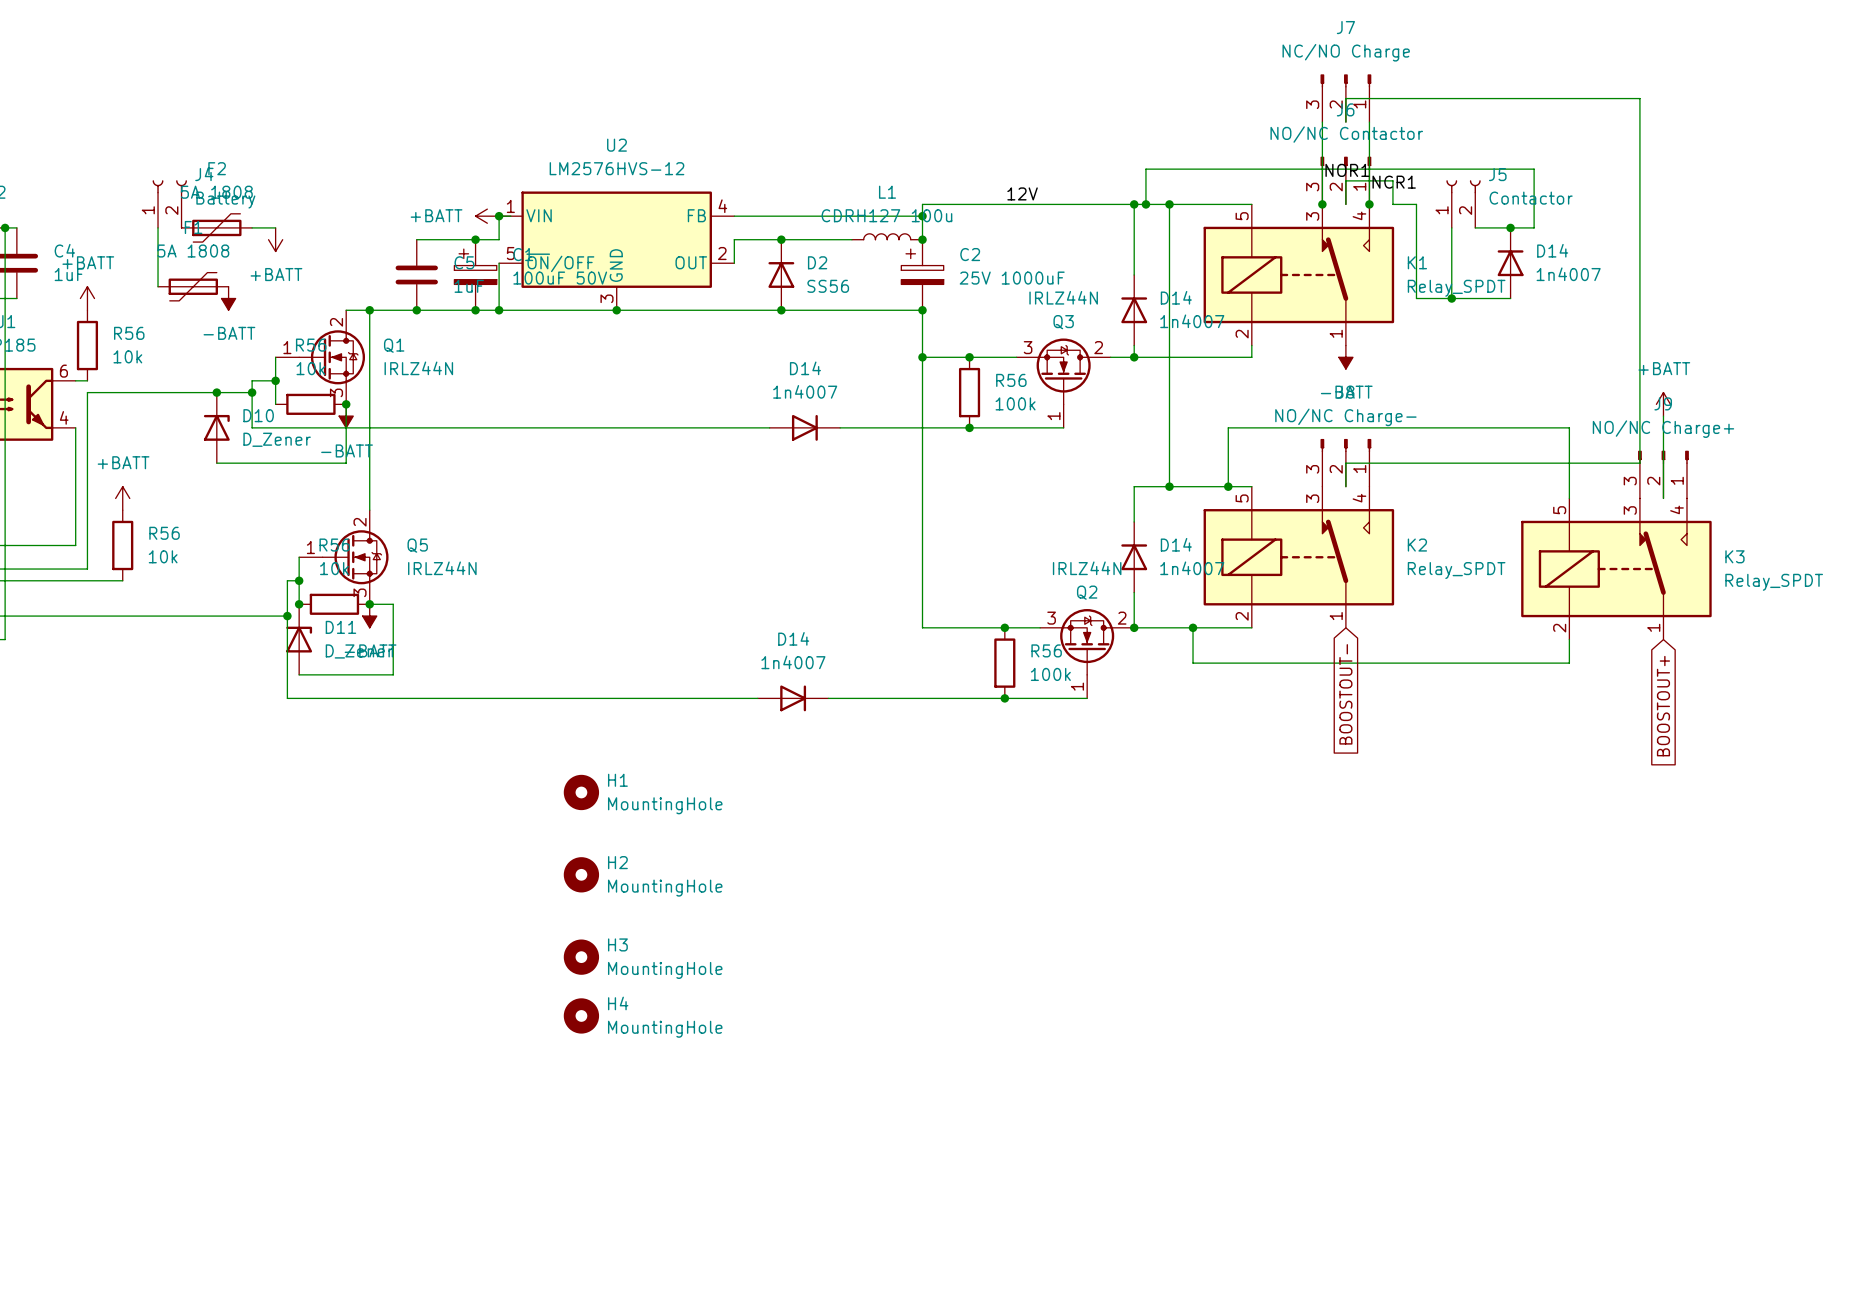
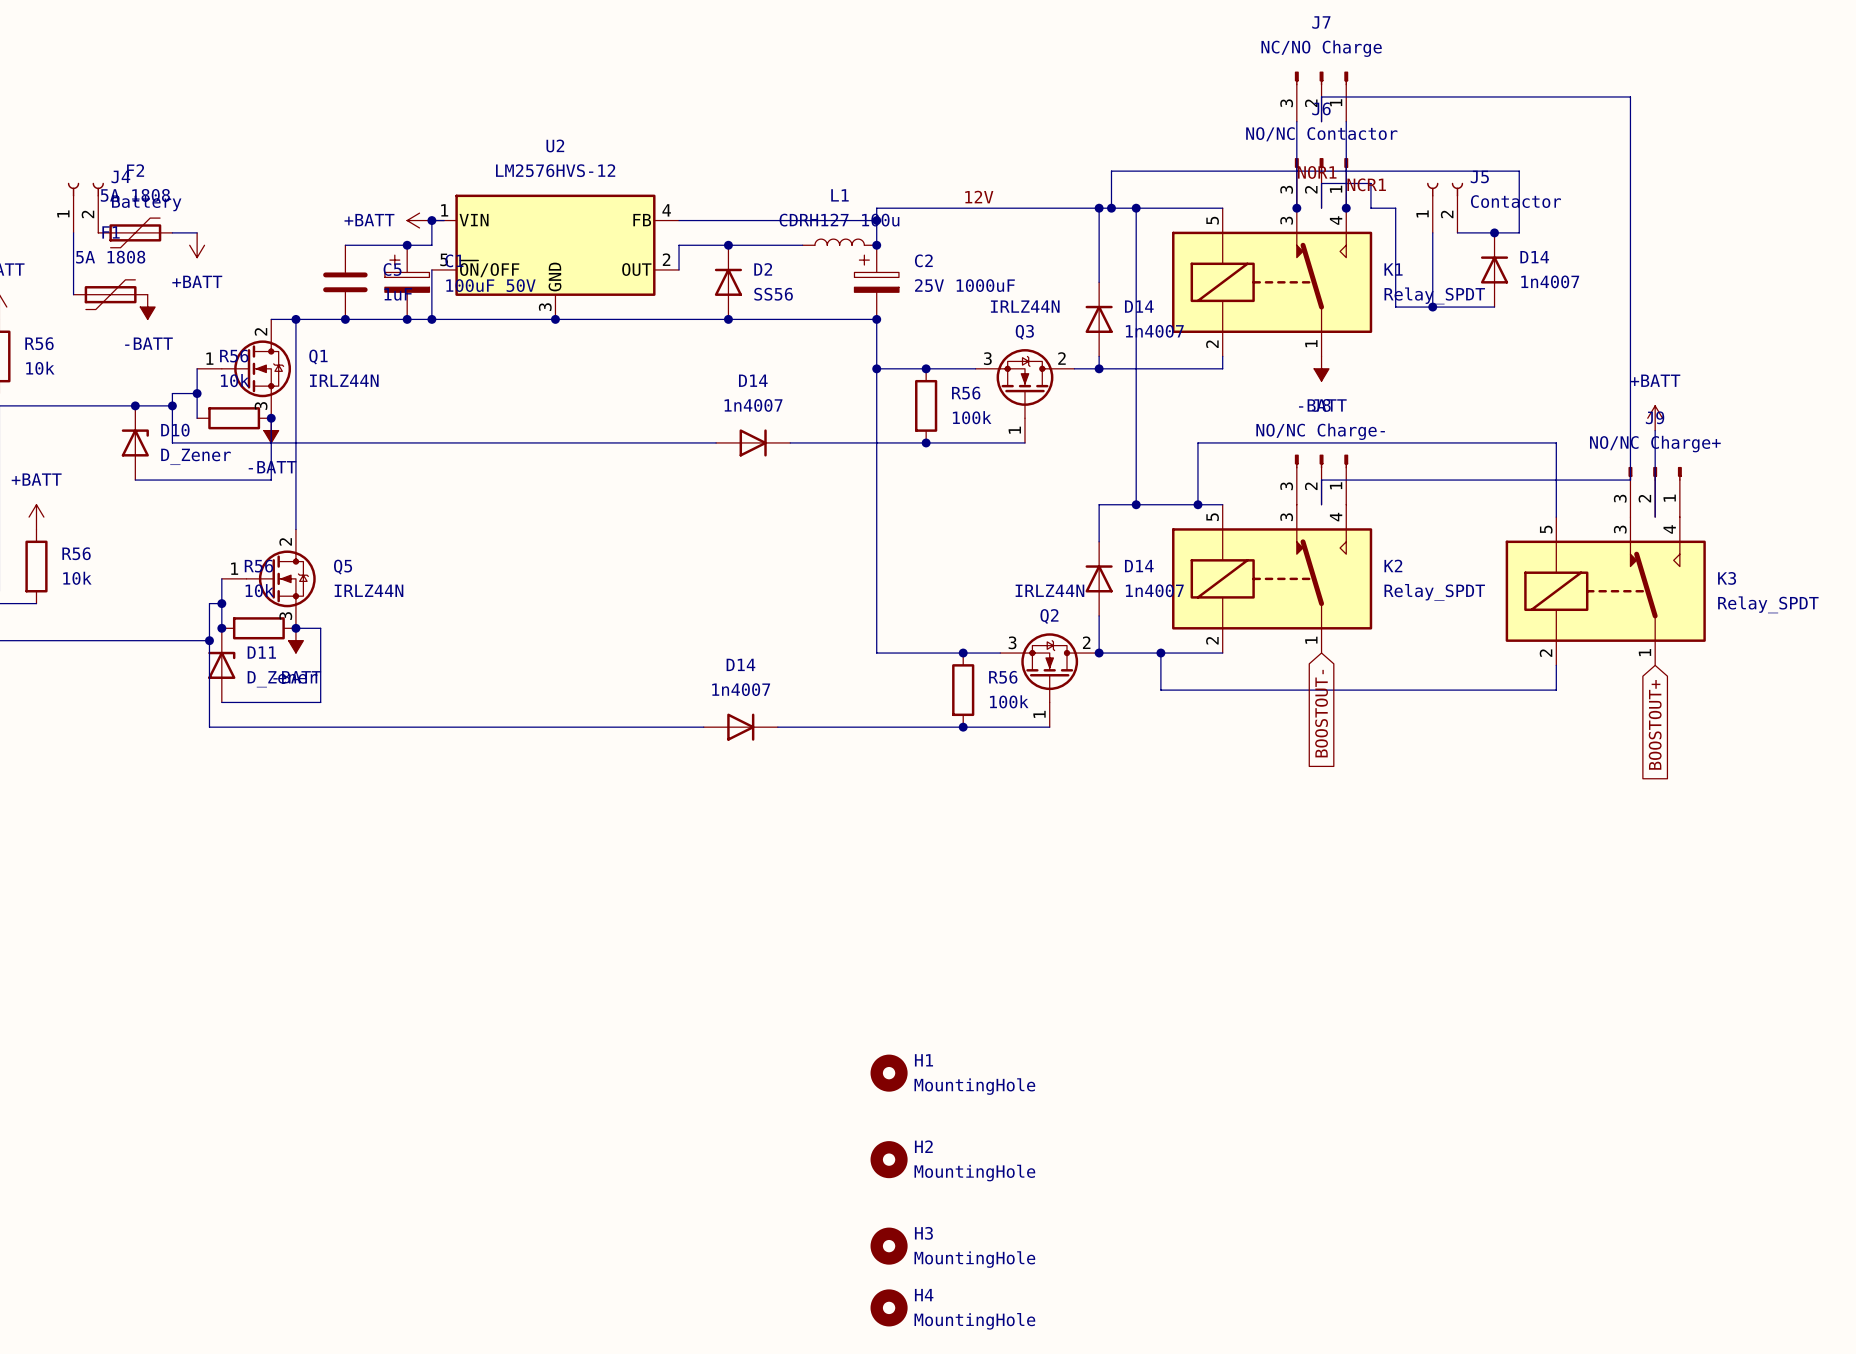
H1 position: (581, 792) -> (889, 1073)
H2 position: (581, 874) -> (889, 1159)
H3 position: (581, 957) -> (889, 1246)
H4 position: (581, 1015) -> (889, 1307)

